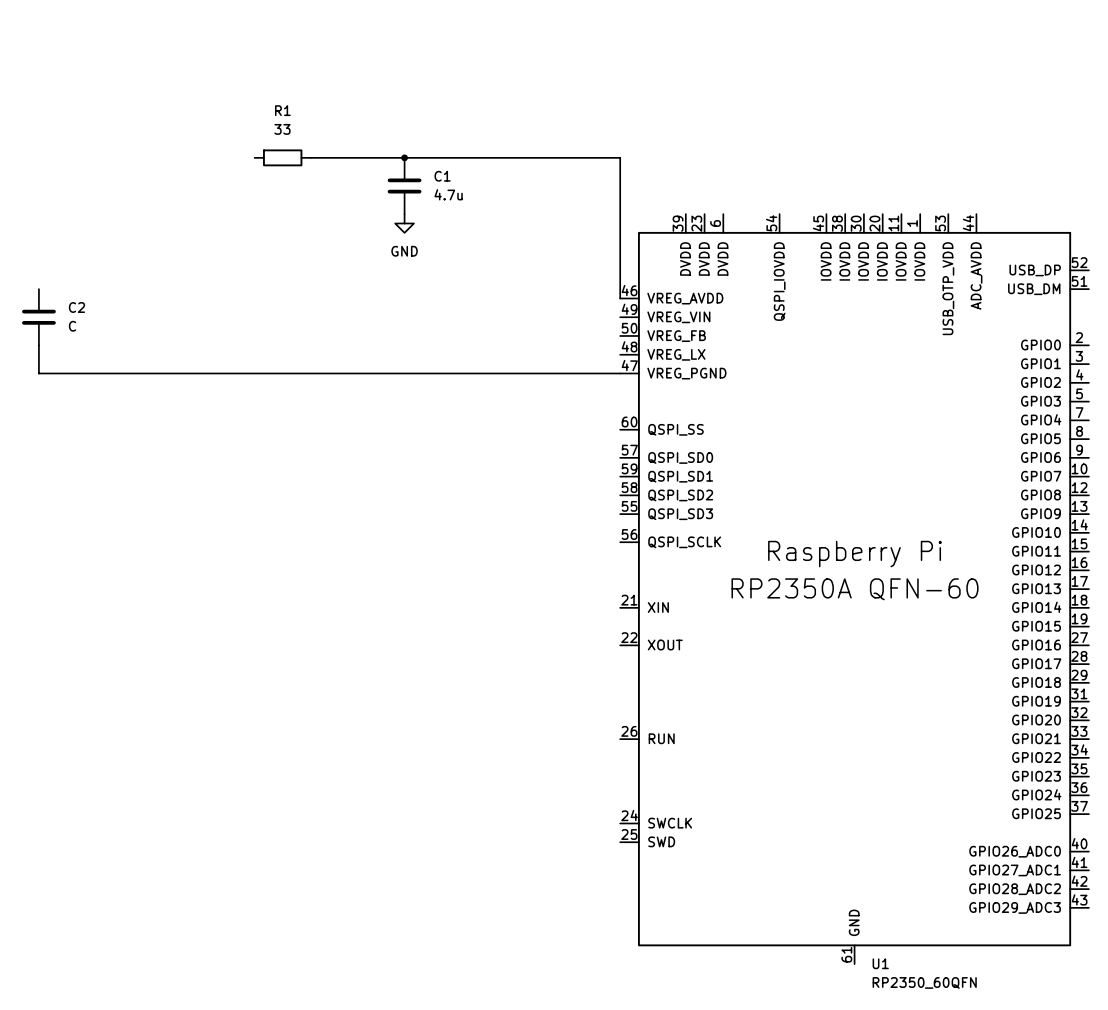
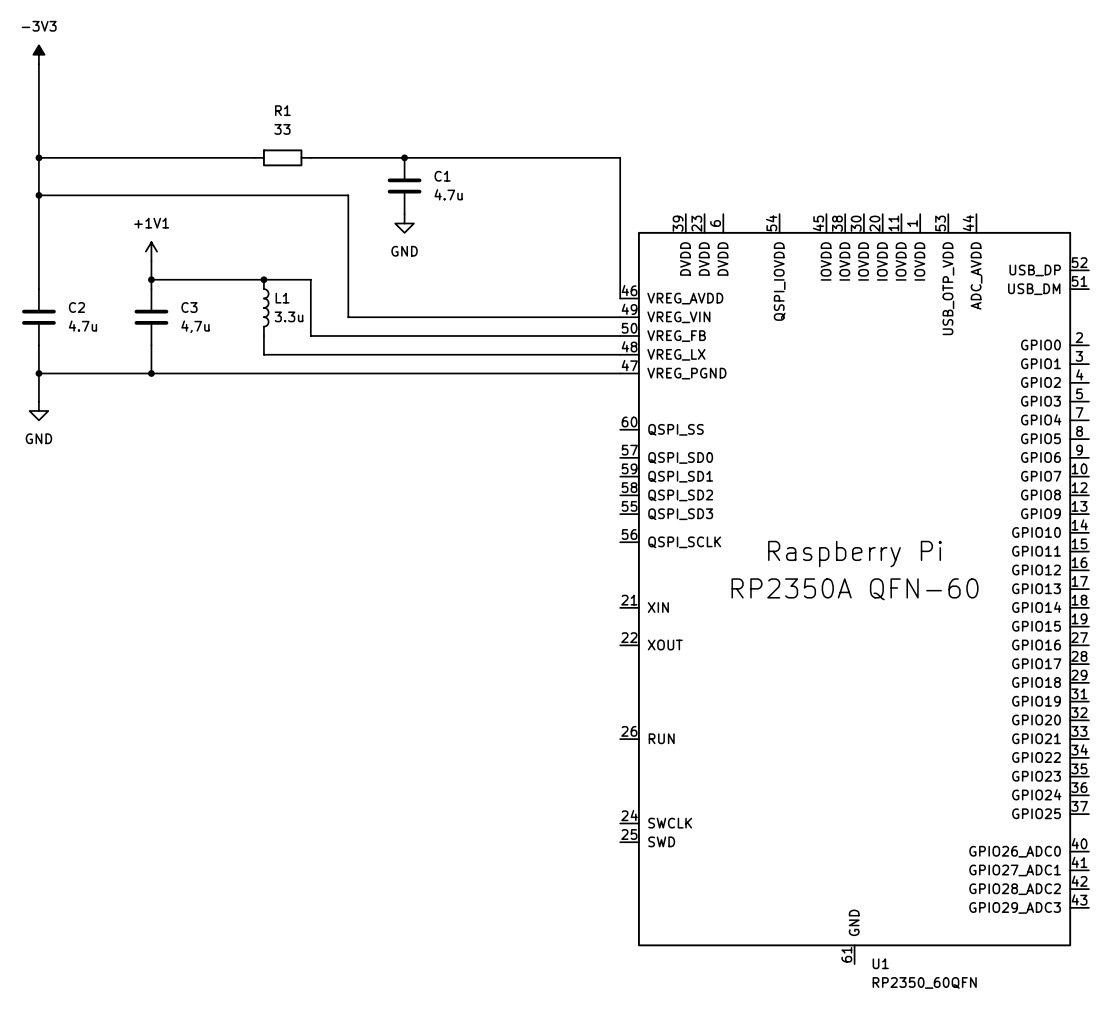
power symbol: none -> -3V3 (38, 54)
wire: none -> (38, 64) (38, 289)
wire: none -> (38, 157) (254, 157)
junction: none -> (38, 157)
wire: none -> (38, 195) (348, 195) (348, 317) (620, 317)
junction: none -> (38, 195)
power symbol: none -> +1V1 (151, 251)
wire: none -> (151, 260) (151, 289)
wire: none -> (151, 279) (310, 279) (310, 335) (620, 335)
junction: none -> (151, 279)
junction: none -> (263, 279)
L1: none -> 3.3u (266, 307)
C3: none -> 4,7u (151, 317)
C2 value: C (72, 326) -> 4.7u (82, 326)
wire: none -> (263, 335) (263, 354) (620, 354)
wire: none -> (151, 345) (151, 373)
wire: none -> (38, 373) (38, 401)
junction: none -> (38, 373)
junction: none -> (151, 373)
power symbol: none -> GND (38, 410)

